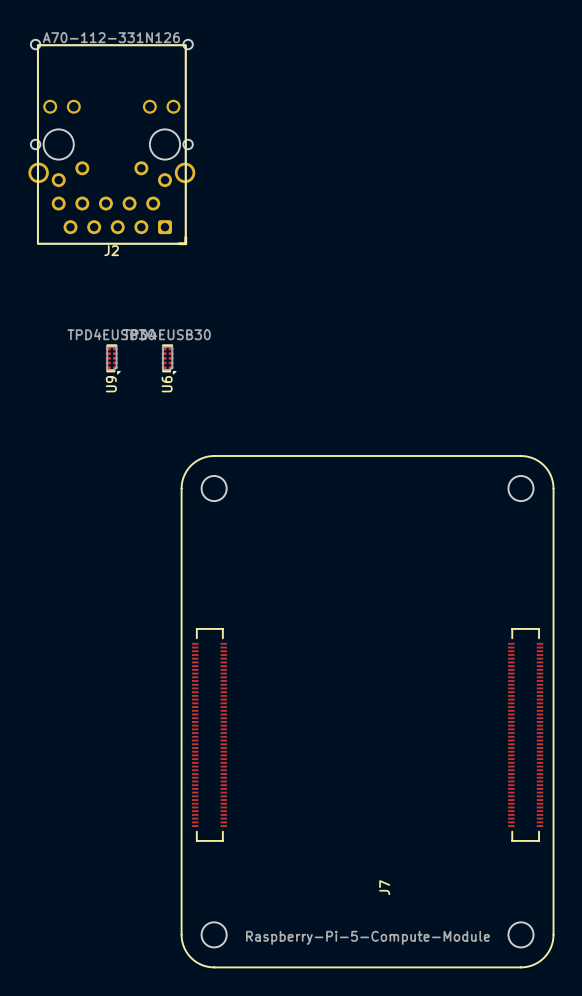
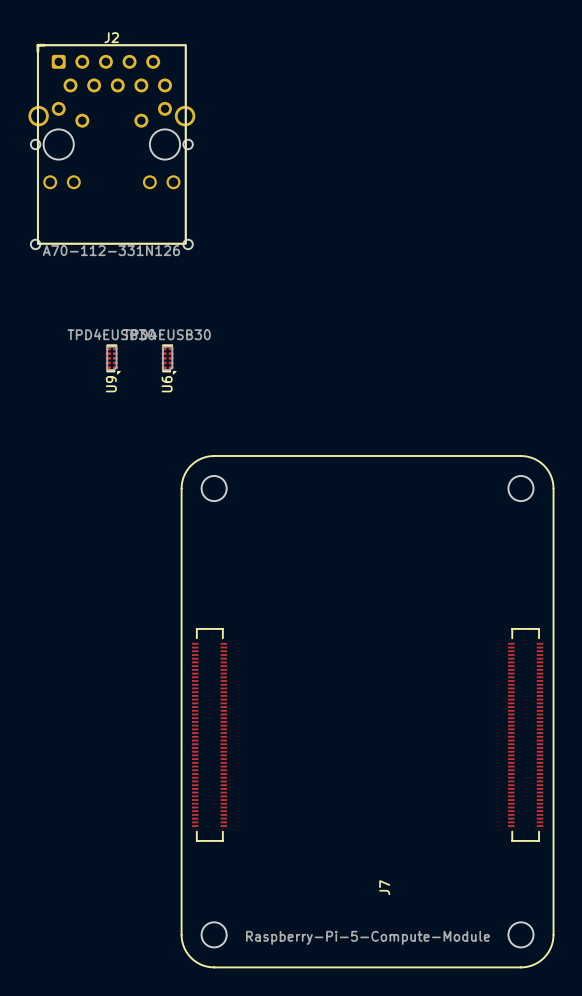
J2 rotation: 0° (111, 142) -> 180° (111, 146)

